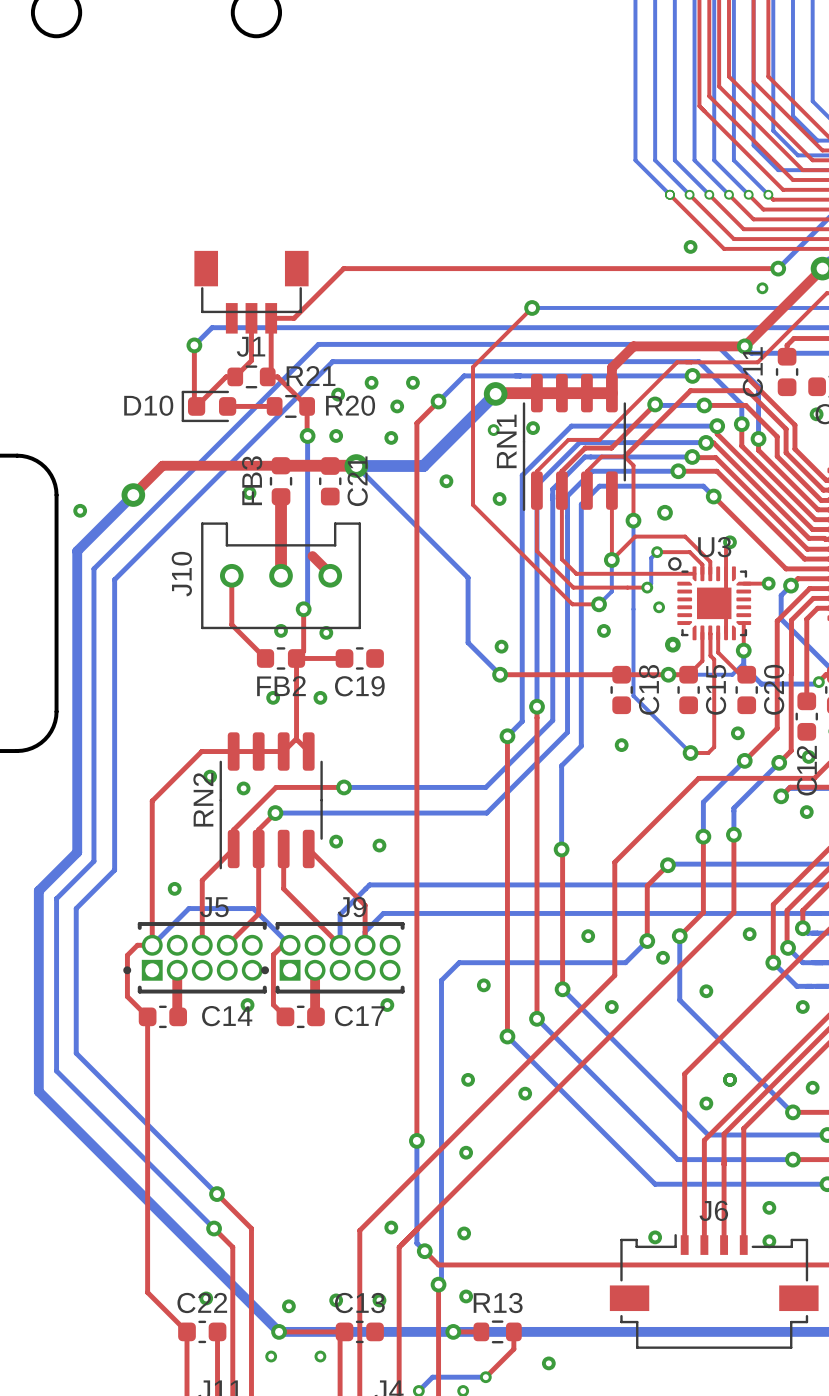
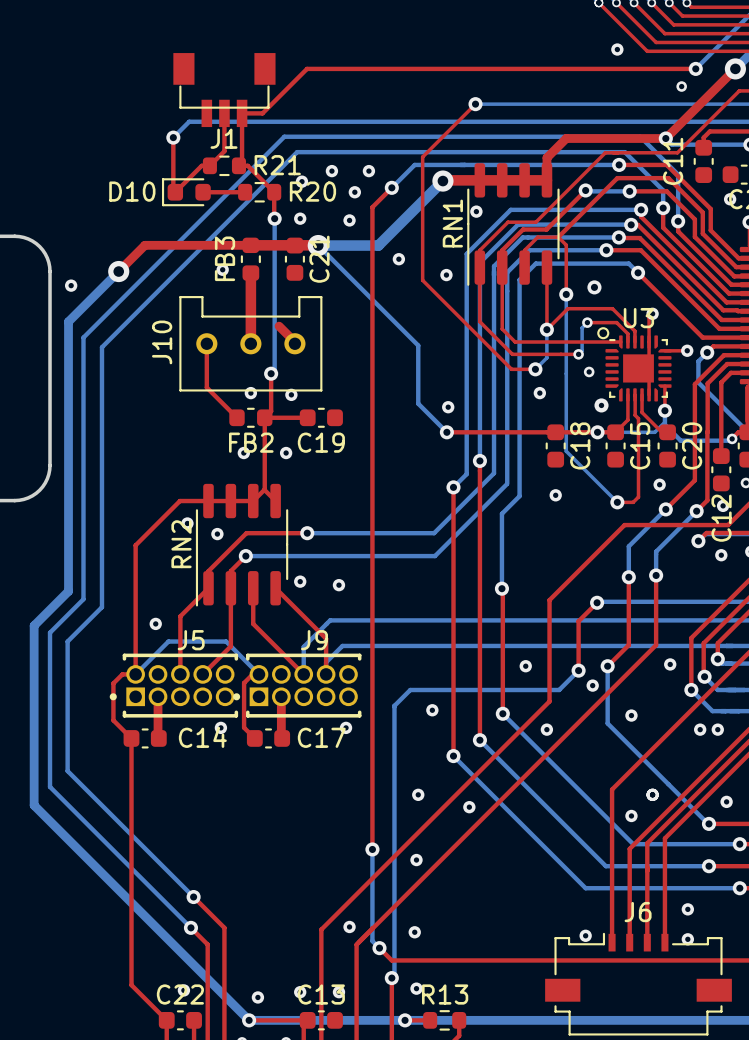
via: (493, 430) -> none
via: none -> (700, 729)

